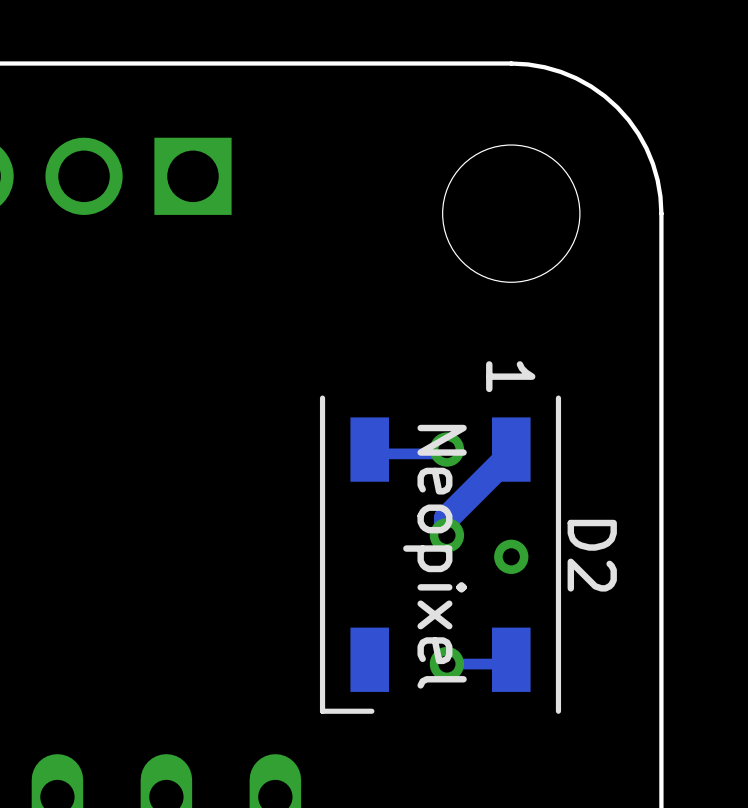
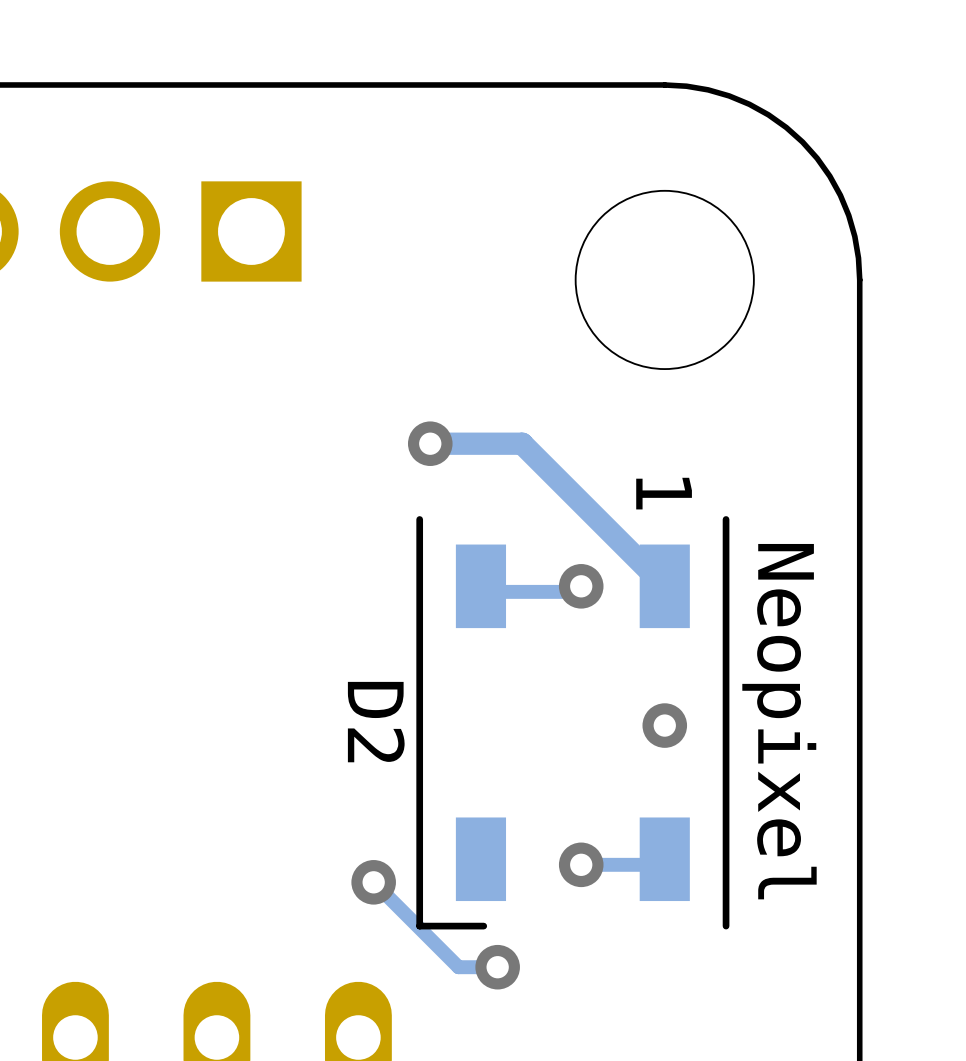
track: none -> (430, 443) (522, 443) (664, 586)
via: none -> (430, 443)
track: (511, 453) (446, 518) (446, 535) -> none
via: (446, 535) -> none
D2 name position: D2 (592, 555) -> D2 (376, 722)
D2 value position: Neopixel (434, 556) -> Neopixel (779, 721)
track: none -> (373, 882) (458, 967) (497, 967)
via: none -> (373, 882)
via: none -> (497, 967)

